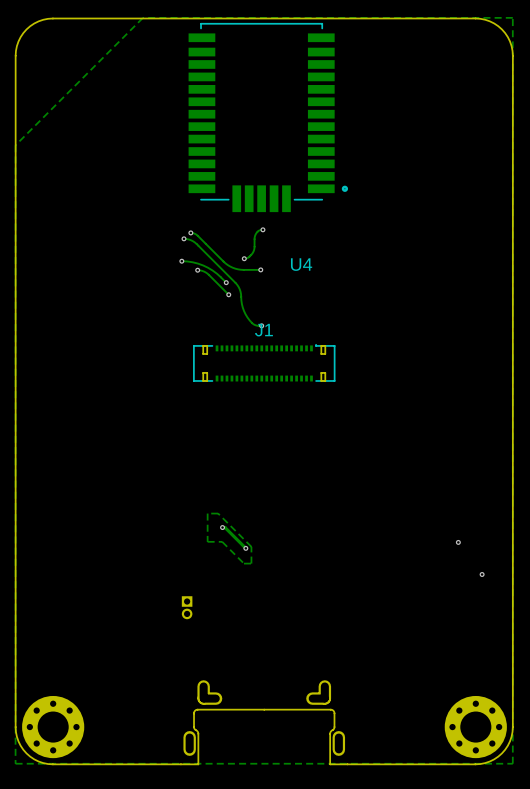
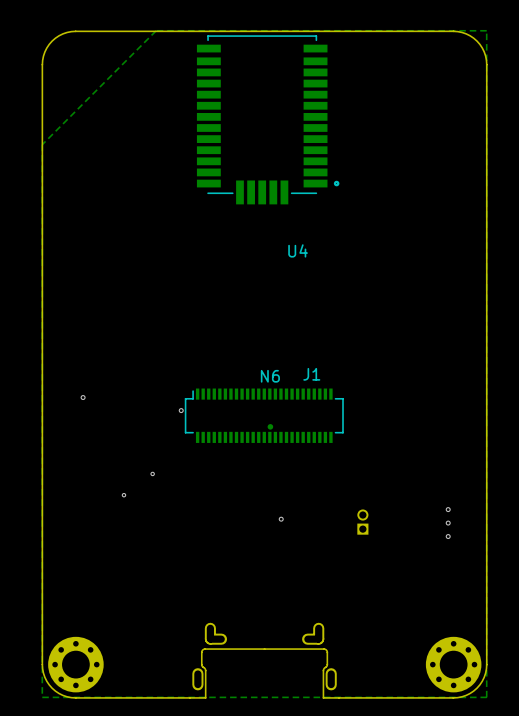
track: (262, 229) (258, 230) (255, 235) (252, 252) (244, 258) -> none
via: (262, 229) -> none
track: (190, 232) (197, 235) (230, 266) (240, 269) (260, 269) -> none
via: (190, 232) -> none
track: (184, 238) (194, 242) (235, 282) (241, 296) -> none
via: (184, 238) -> none
via: (244, 258) -> none
track: (181, 261) (192, 262) (208, 267) (226, 282) -> none
via: (181, 261) -> none
via: (260, 269) -> none
track: (197, 270) (207, 273) (228, 294) -> none
via: (197, 270) -> none
via: (226, 282) -> none
via: (228, 294) -> none
track: (241, 296) (242, 307) (247, 317) (254, 324) (261, 325) -> none
via: (261, 325) -> none
J1 name position: J1 (263, 330) -> J1 (311, 374)
J1 footprint: [193, 344, 336, 382] -> [184, 388, 344, 443]
via: none -> (83, 397)
via: none -> (181, 410)
N6: none -> (270, 426)
via: none -> (152, 473)
zone outline: (218, 513) (251, 546) (251, 563) (243, 563) (222, 541) (207, 541) (207, 513) (218, 513) -> none
track: (222, 527) (225, 527) (245, 548) -> none
via: (222, 527) -> none
via: none -> (123, 495)
via: (458, 542) -> none
via: (245, 548) -> none
via: none -> (448, 509)
via: none -> (281, 519)
part: none -> (362, 522)
via: none -> (448, 523)
via: (482, 574) -> none
via: none -> (448, 536)
part: (187, 607) -> none

